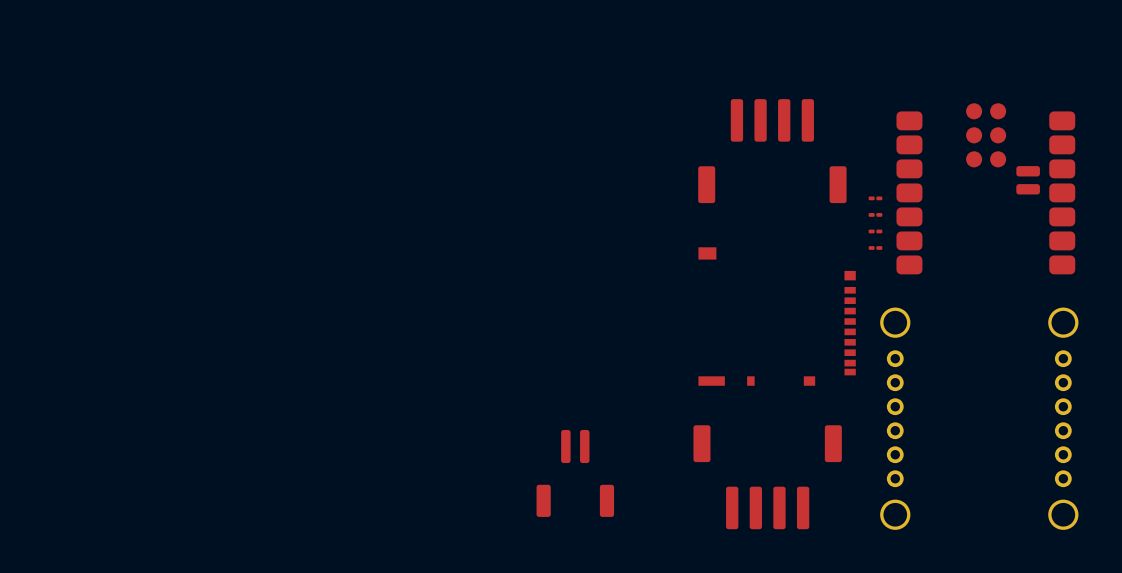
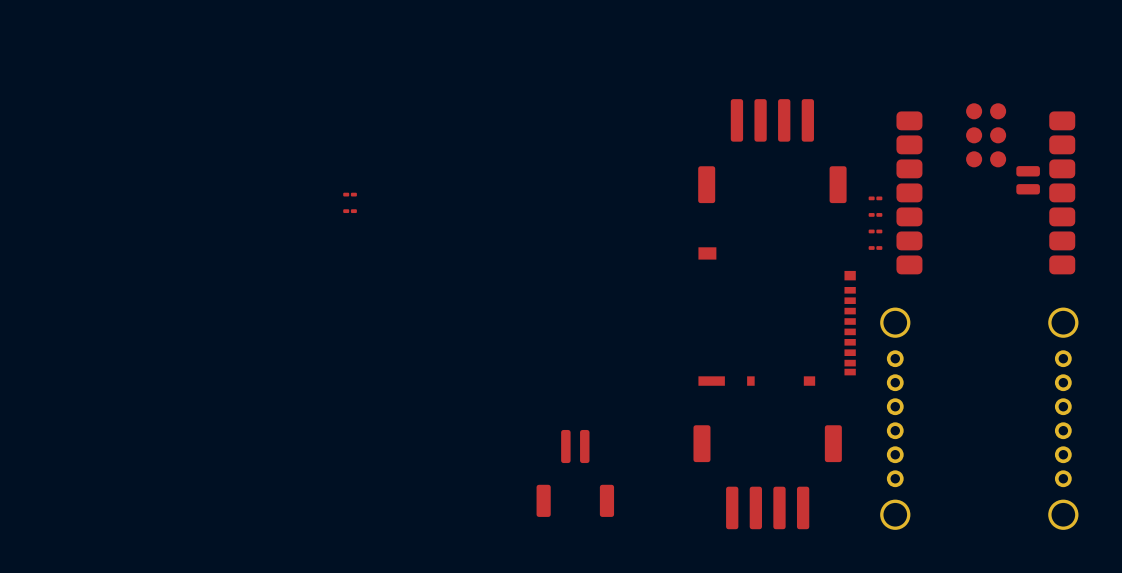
part: none -> (350, 194)
part: none -> (350, 211)

